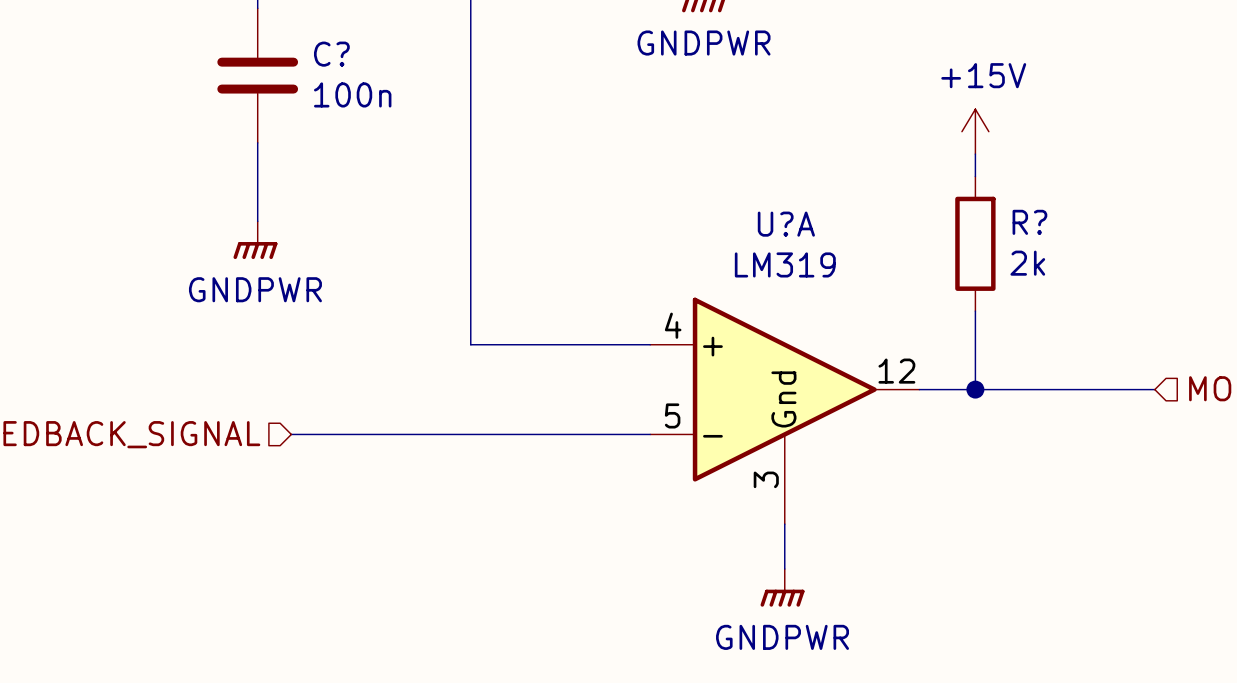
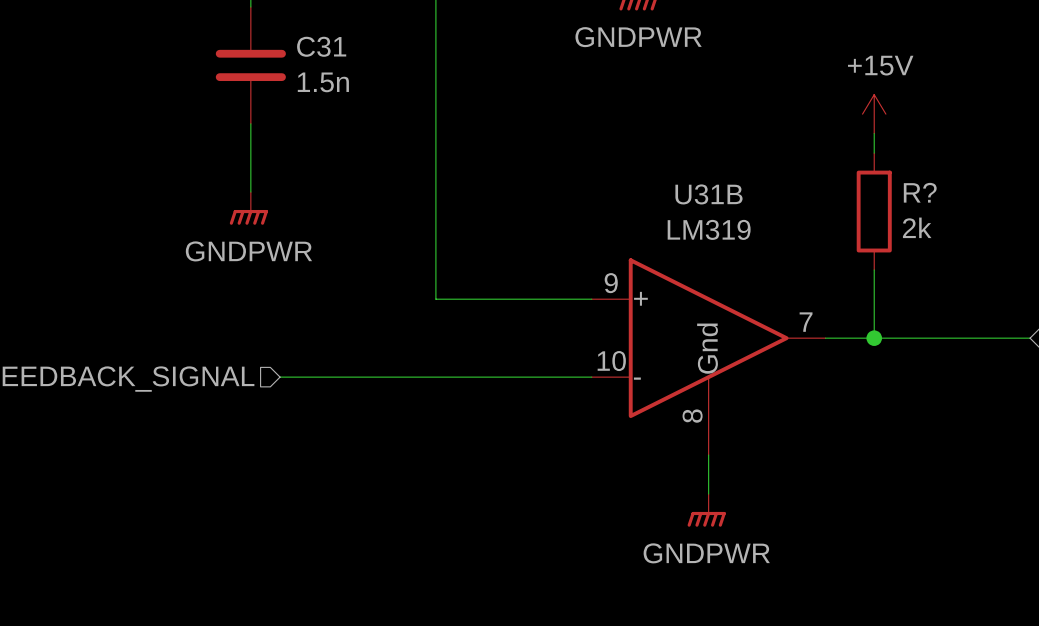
C? name: C? (331, 54) -> C31 (321, 46)
C? value: 100n (352, 94) -> 1.5n (323, 82)
U?A name: U?A (786, 224) -> U31B (708, 194)
U?A pin number: 4 (673, 325) -> 9 (611, 283)
U?A pin number: 12 (896, 371) -> 7 (806, 322)
U?A pin number: 5 (672, 415) -> 10 (611, 361)
U?A pin number: 3 (766, 479) -> 8 (692, 416)

